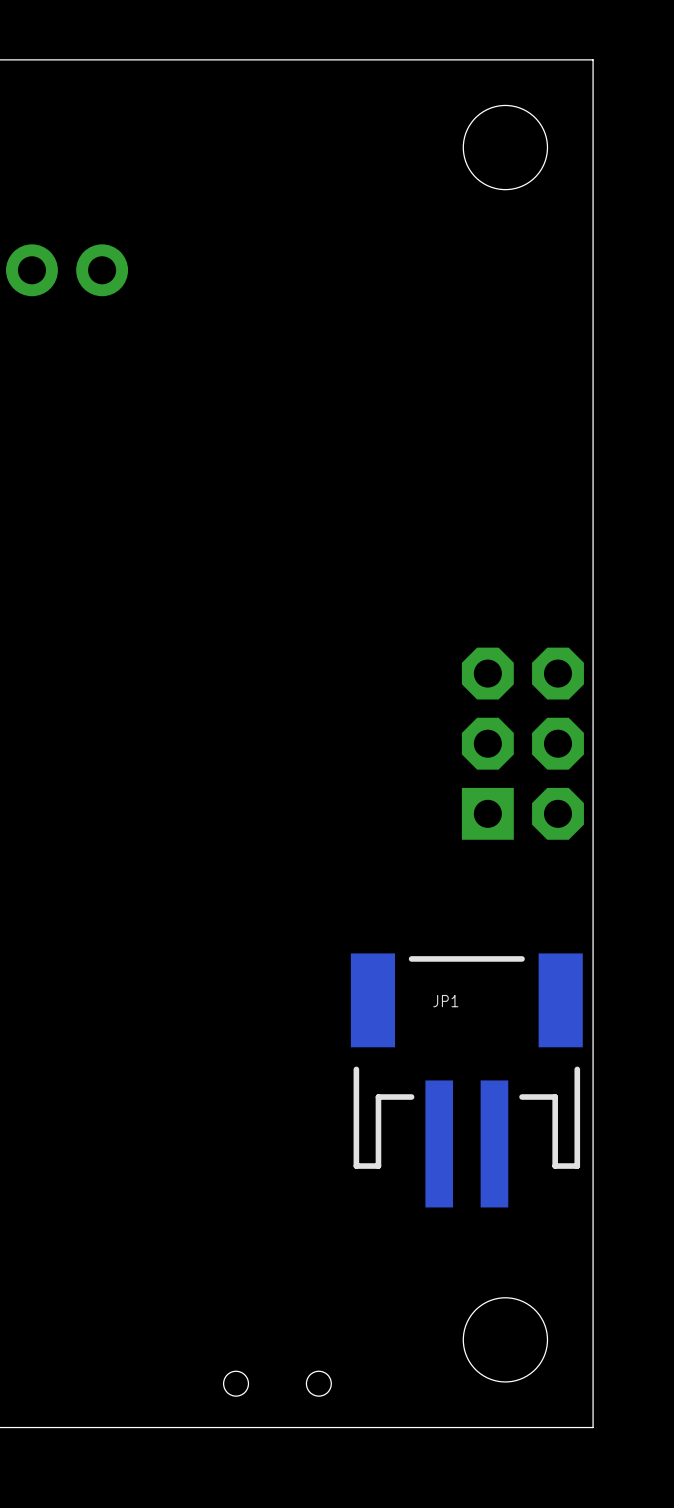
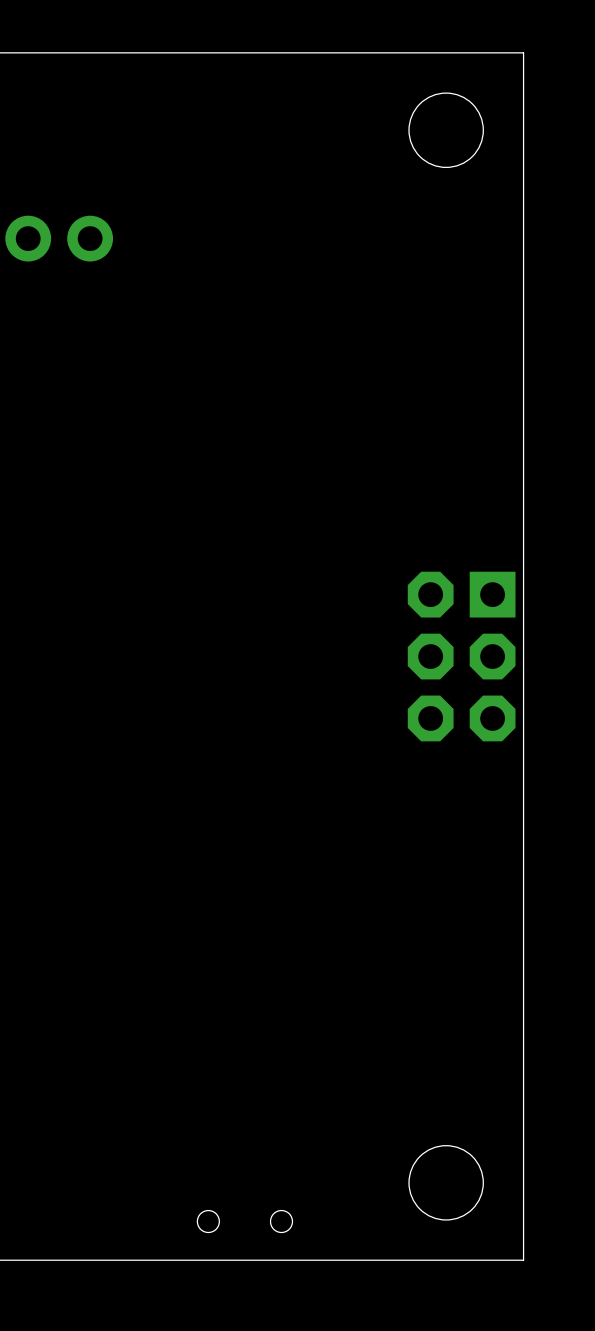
part rotation: 0° (522, 743) -> 180° (461, 656)
JP1: (466, 1080) -> none

